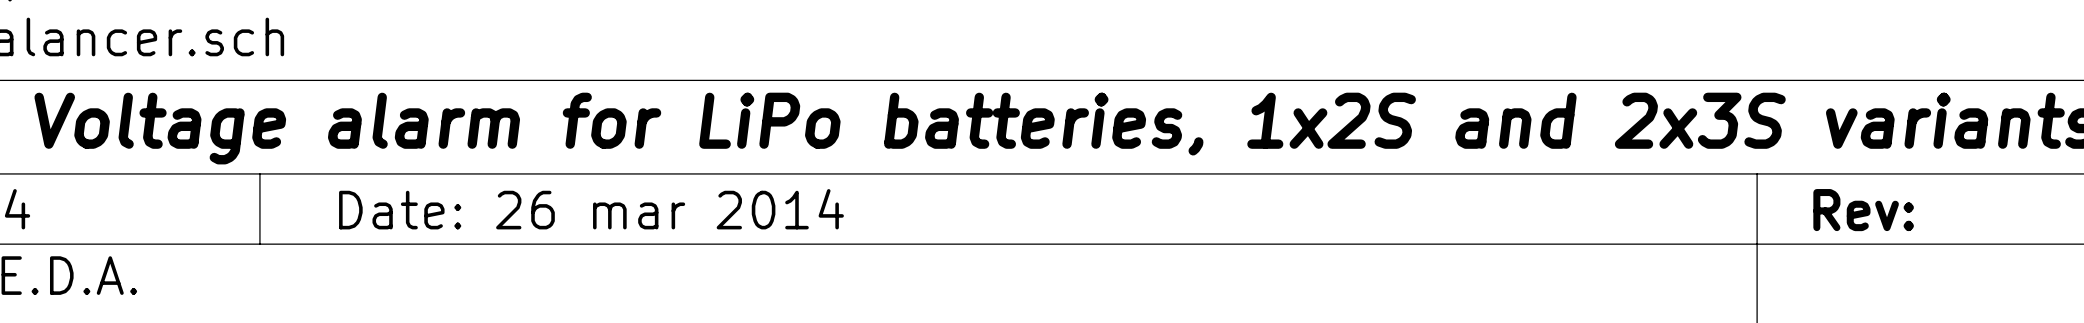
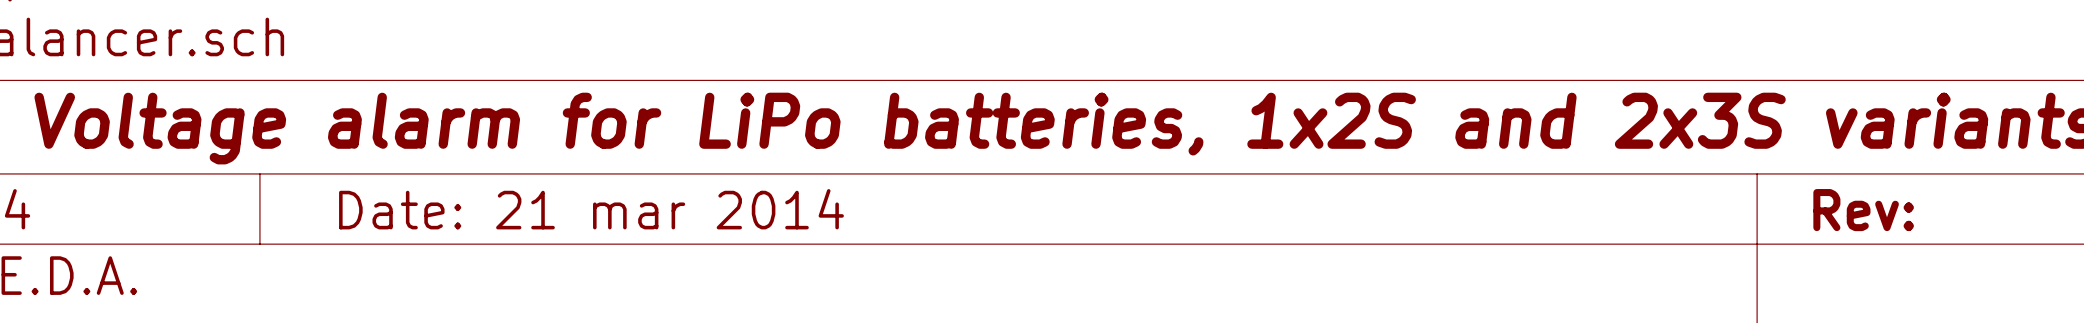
title block: Date: 26 mar 2014 (591, 209) -> Date: 21 mar 2014 (591, 209)

